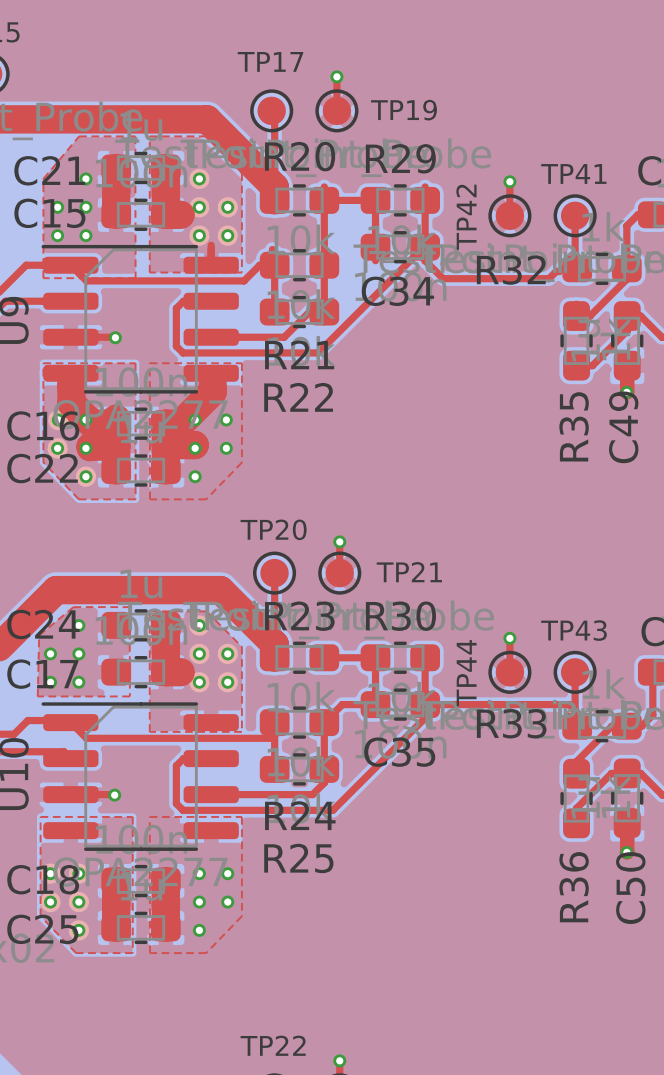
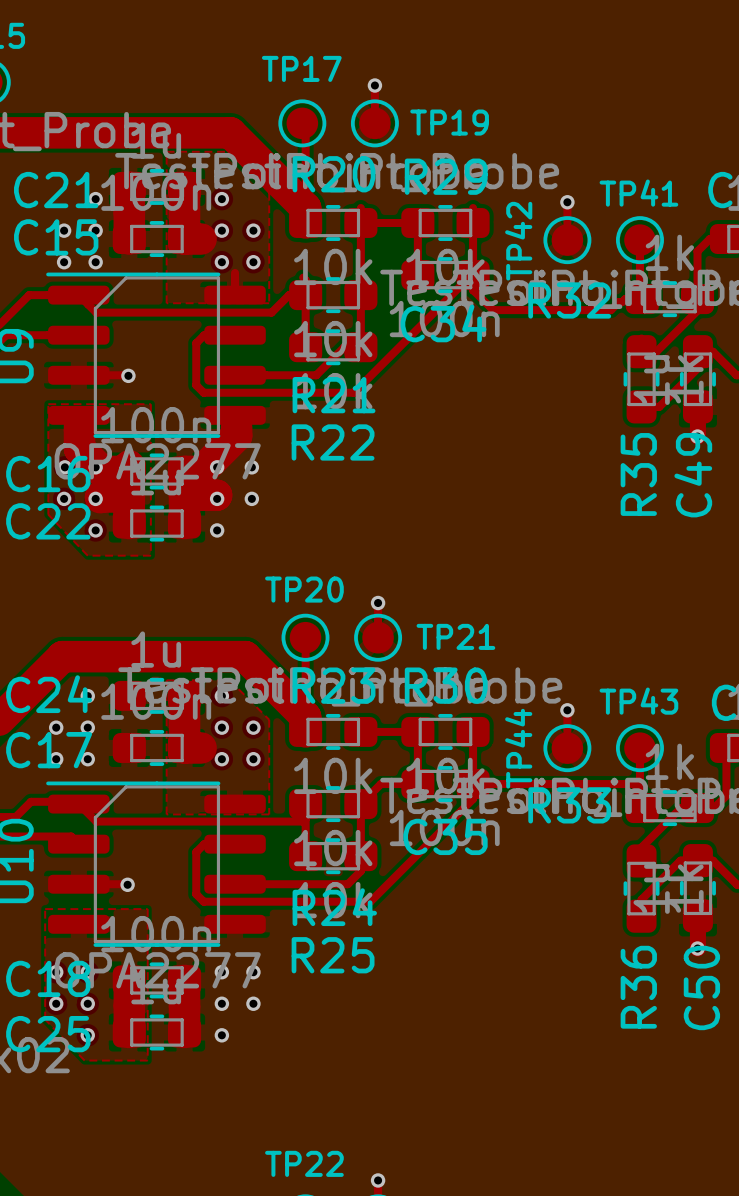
top zone outline: (79, 136) (135, 136) (135, 278) (43, 278) (43, 178) (79, 136) -> none
top zone outline: (149, 363) (241, 363) (241, 462) (206, 499) (150, 499) (149, 363) -> none
top zone outline: (73, 607) (39, 635) (37, 696) (129, 696) (129, 607) (73, 607) -> none
top zone outline: (149, 816) (241, 816) (241, 916) (206, 953) (150, 953) (149, 816) -> none

